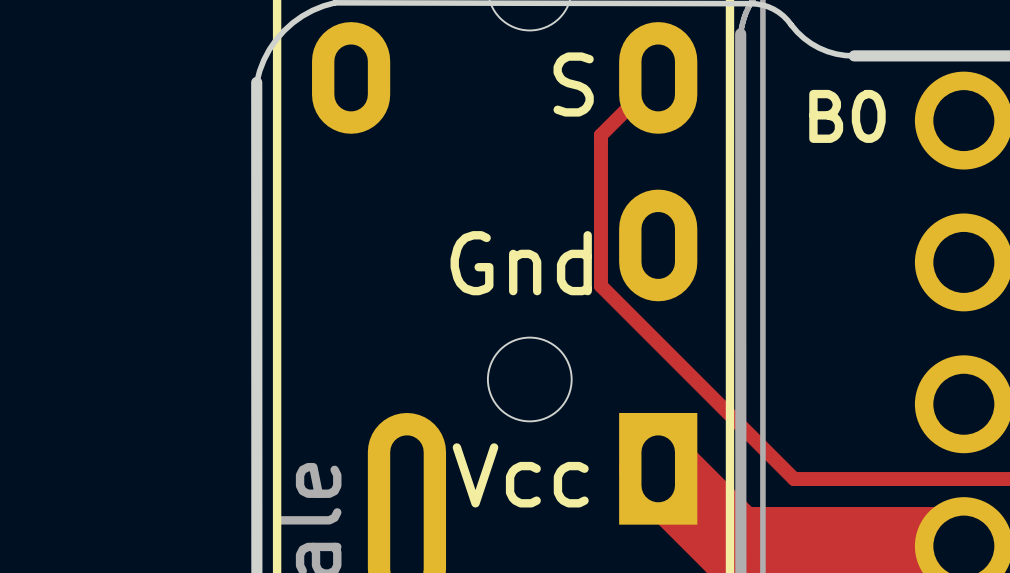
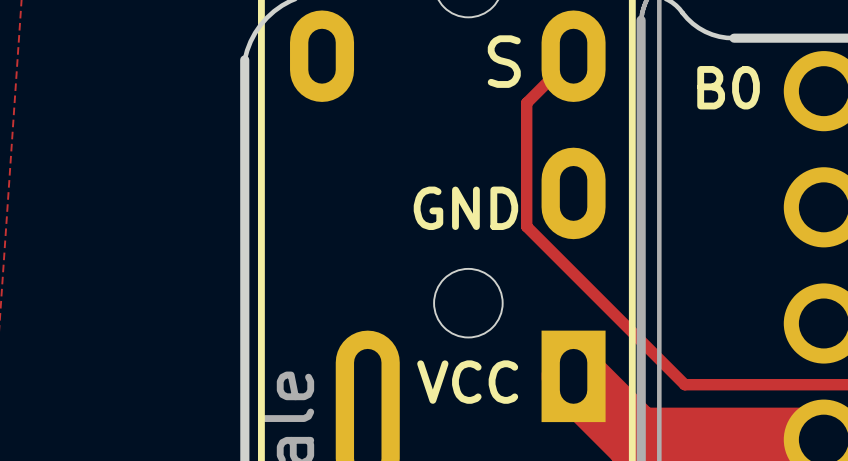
text: Gnd (521, 263) -> GND (465, 208)
text: Vcc (520, 475) -> VCC (467, 382)

